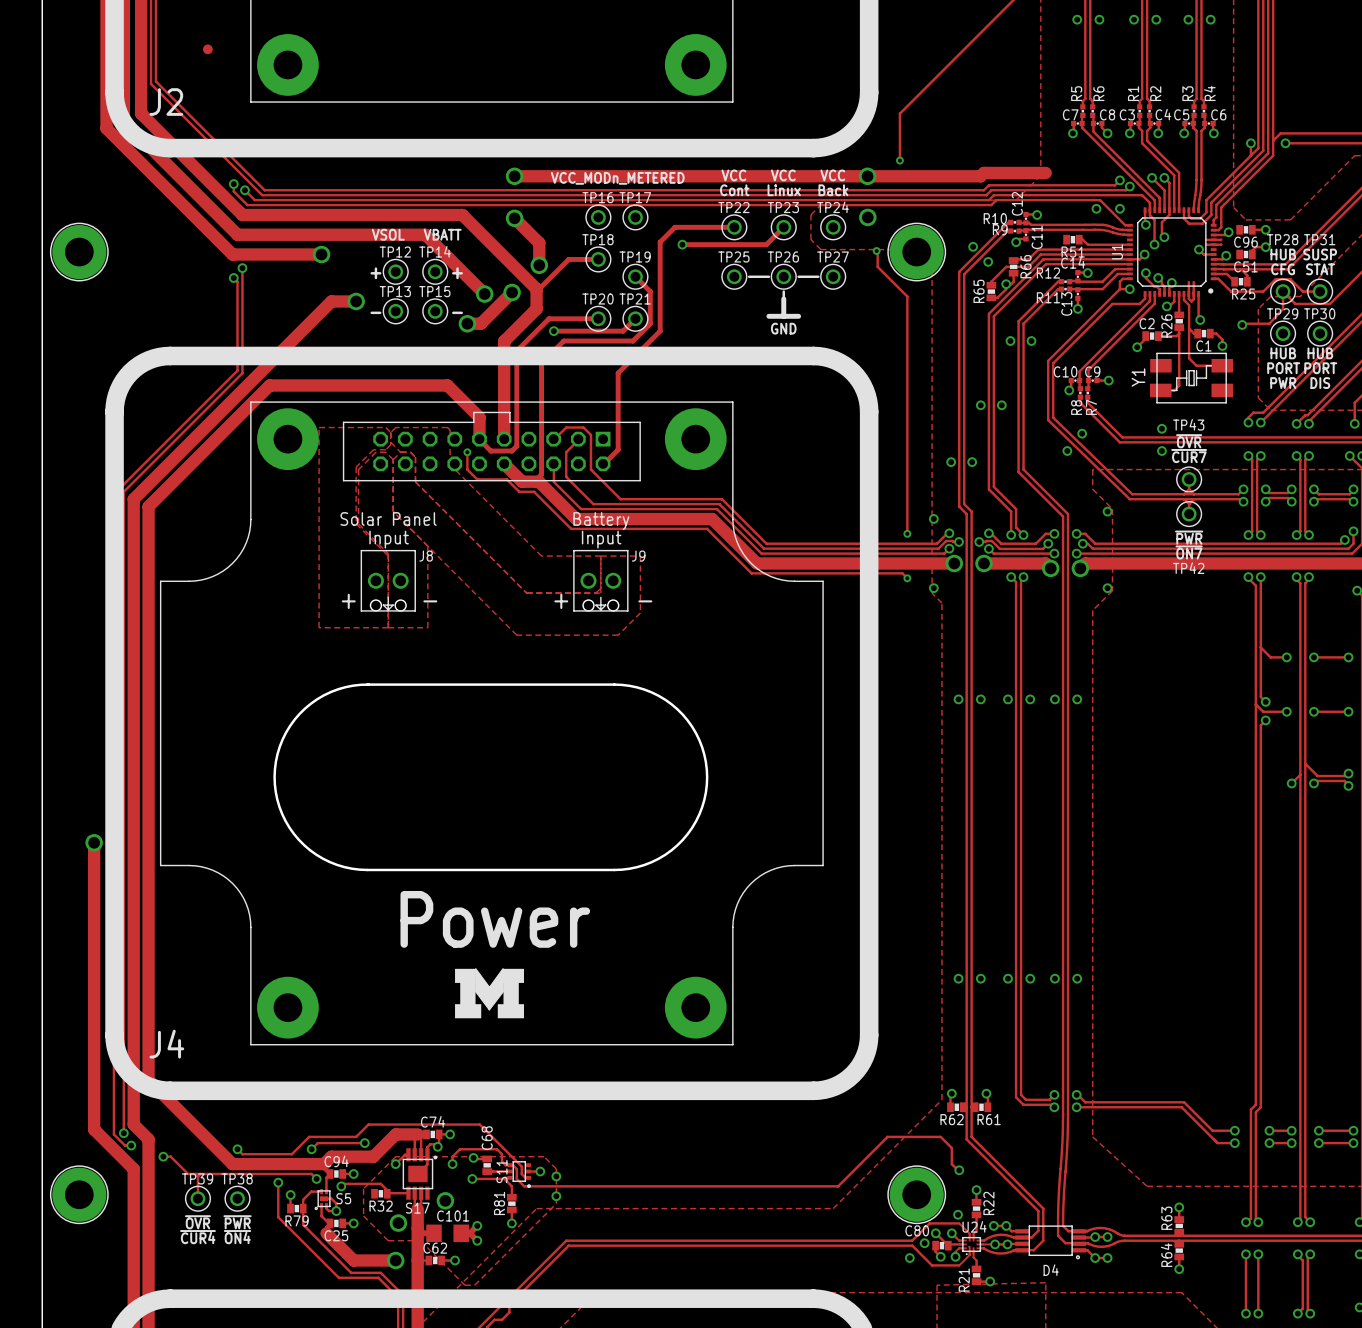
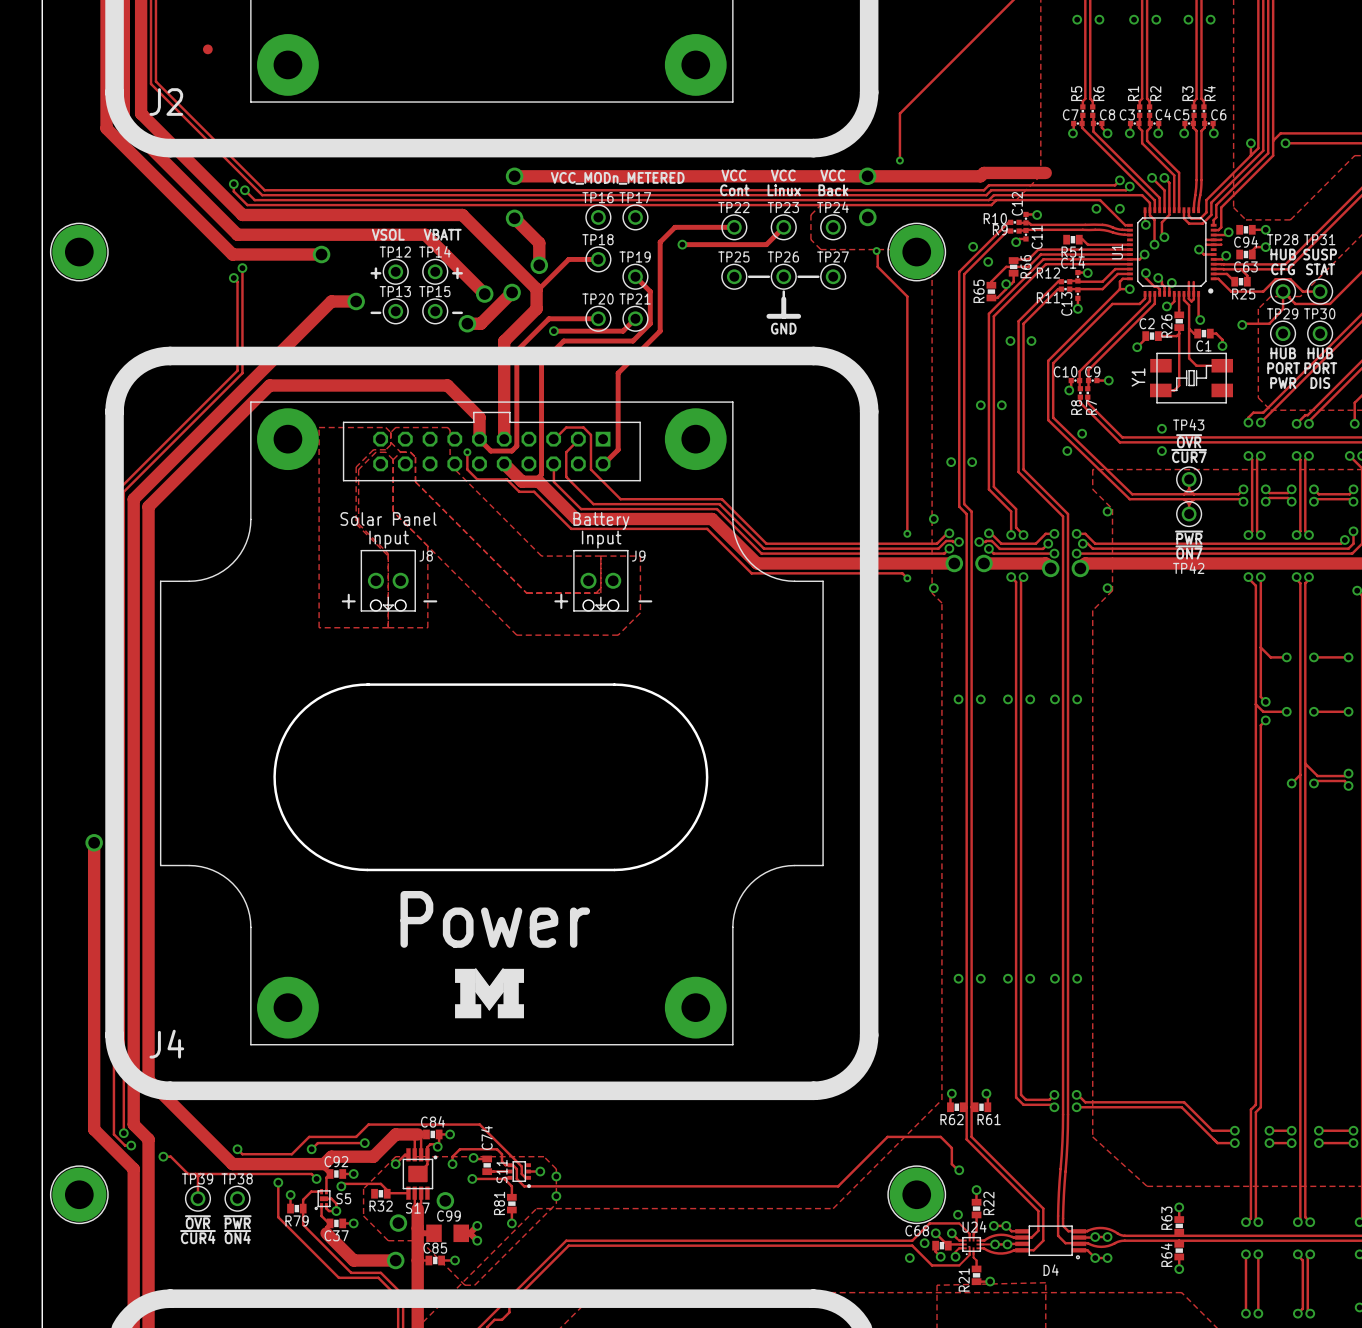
C96 name: C96 (1245, 242) -> C94 (1246, 241)
C51 name: C51 (1245, 266) -> C63 (1245, 266)
C74 name: C74 (432, 1121) -> C84 (432, 1121)
C68 name: C68 (487, 1138) -> C74 (486, 1137)
C94 name: C94 (336, 1161) -> C92 (336, 1161)
C101 name: C101 (453, 1216) -> C99 (448, 1216)
C80 name: C80 (917, 1230) -> C68 (917, 1230)
C25 name: C25 (336, 1235) -> C37 (336, 1235)
C62 name: C62 (435, 1248) -> C85 (435, 1248)

